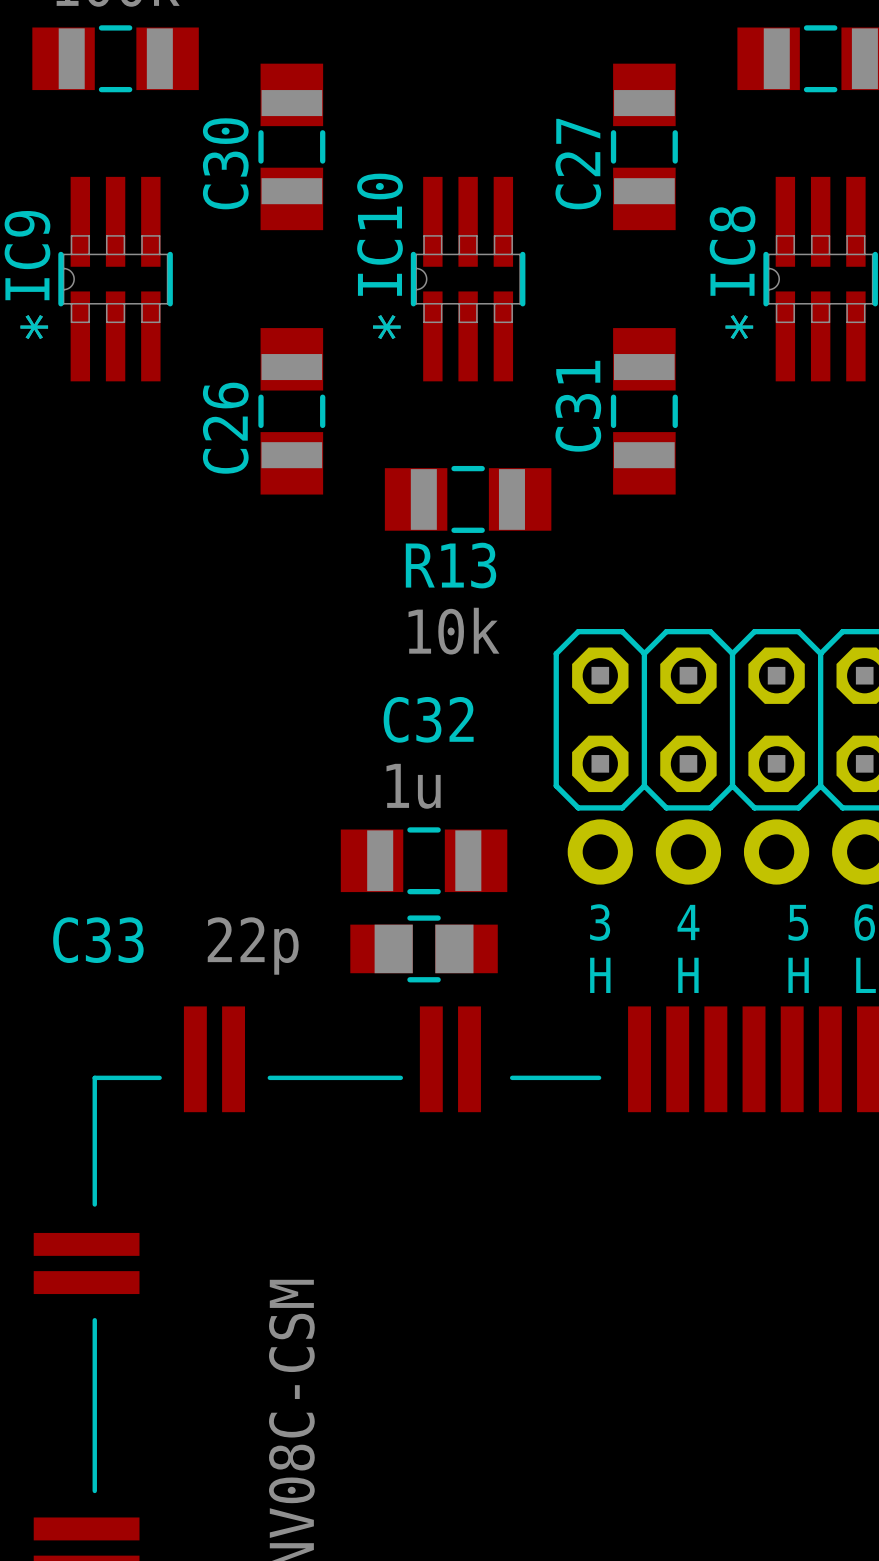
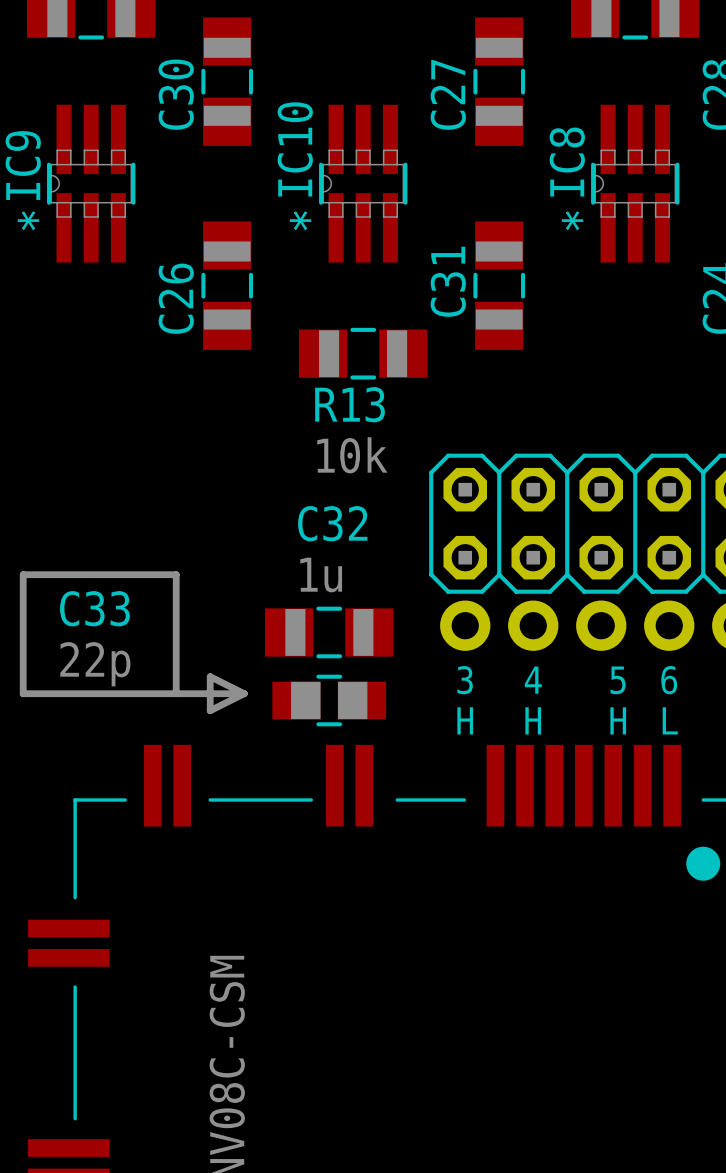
C33 name position: C33 (98, 940) -> C33 (94, 608)
line: none -> (176, 693) (176, 574) (23, 574) (23, 693) (244, 693)
line: none -> (244, 693) (210, 676) (210, 710) (244, 693)
C33 value position: 22p (253, 946) -> 22p (95, 664)

